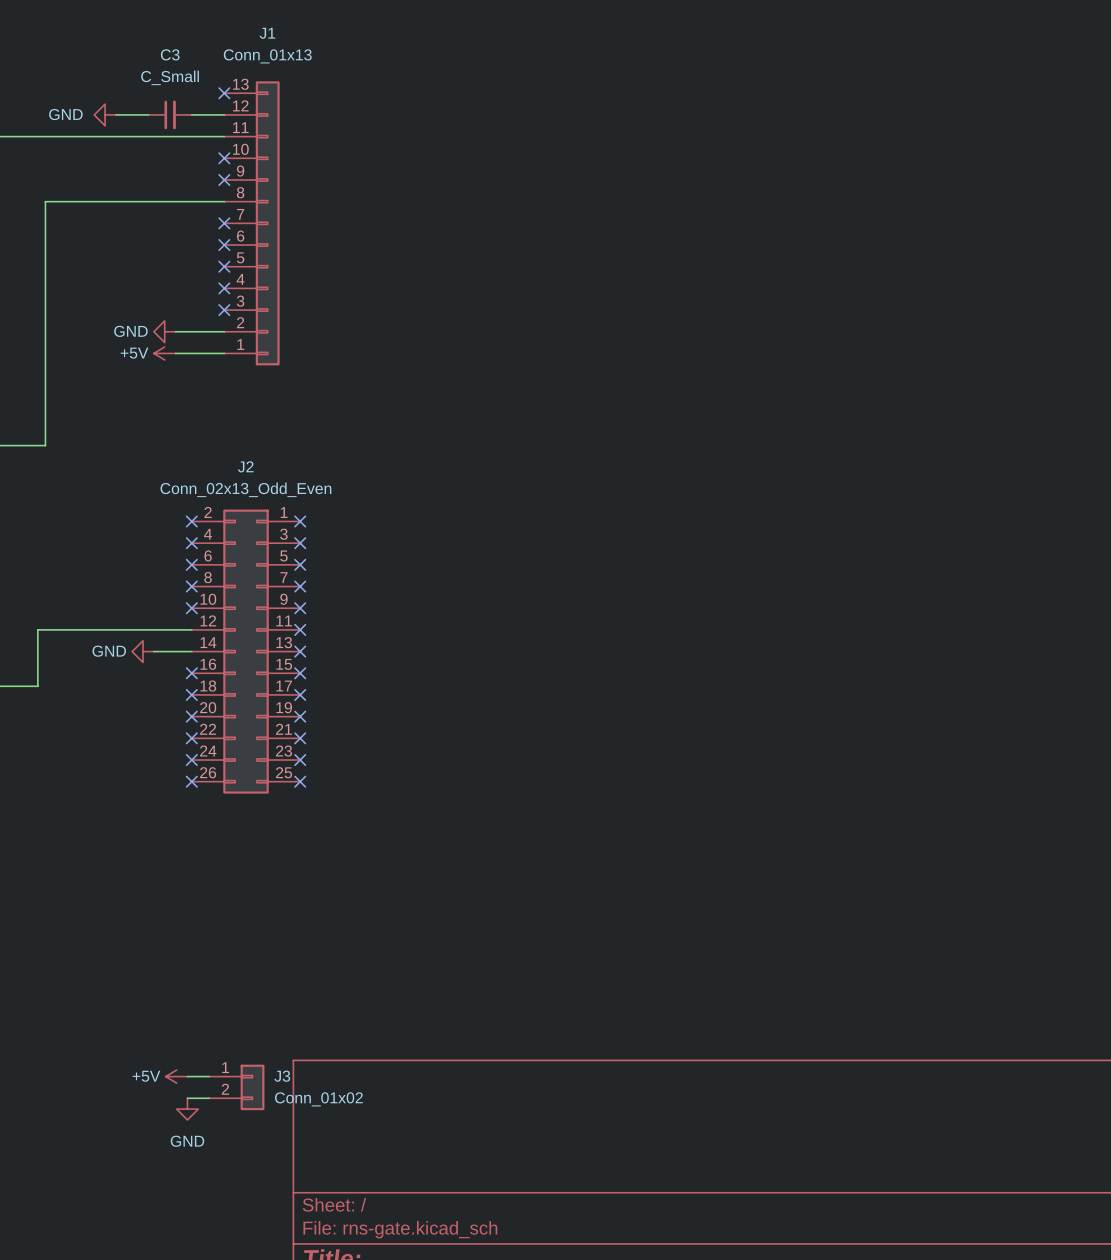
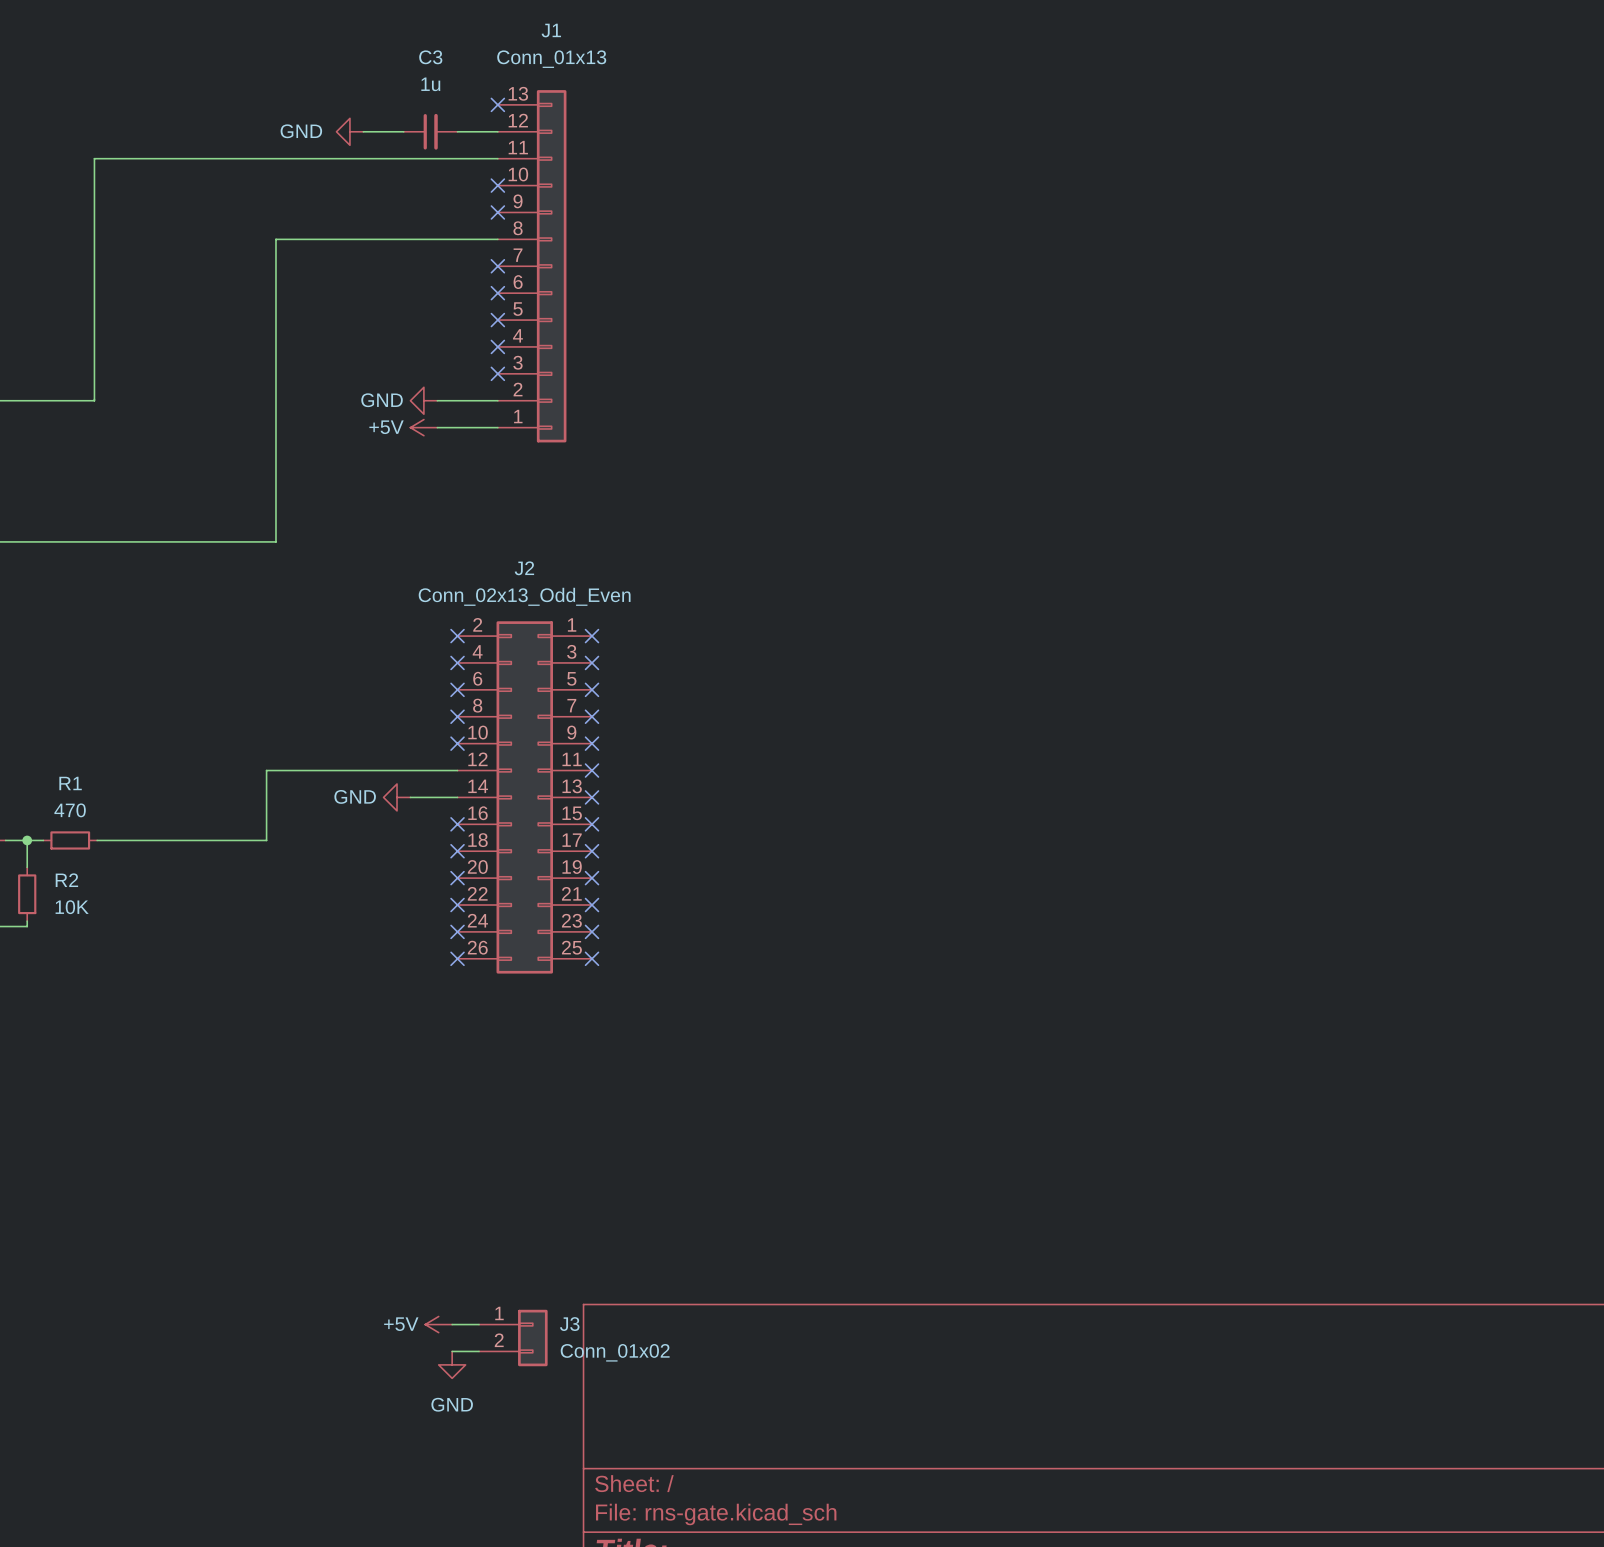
C3 value: C_Small (170, 77) -> 1u (430, 84)

